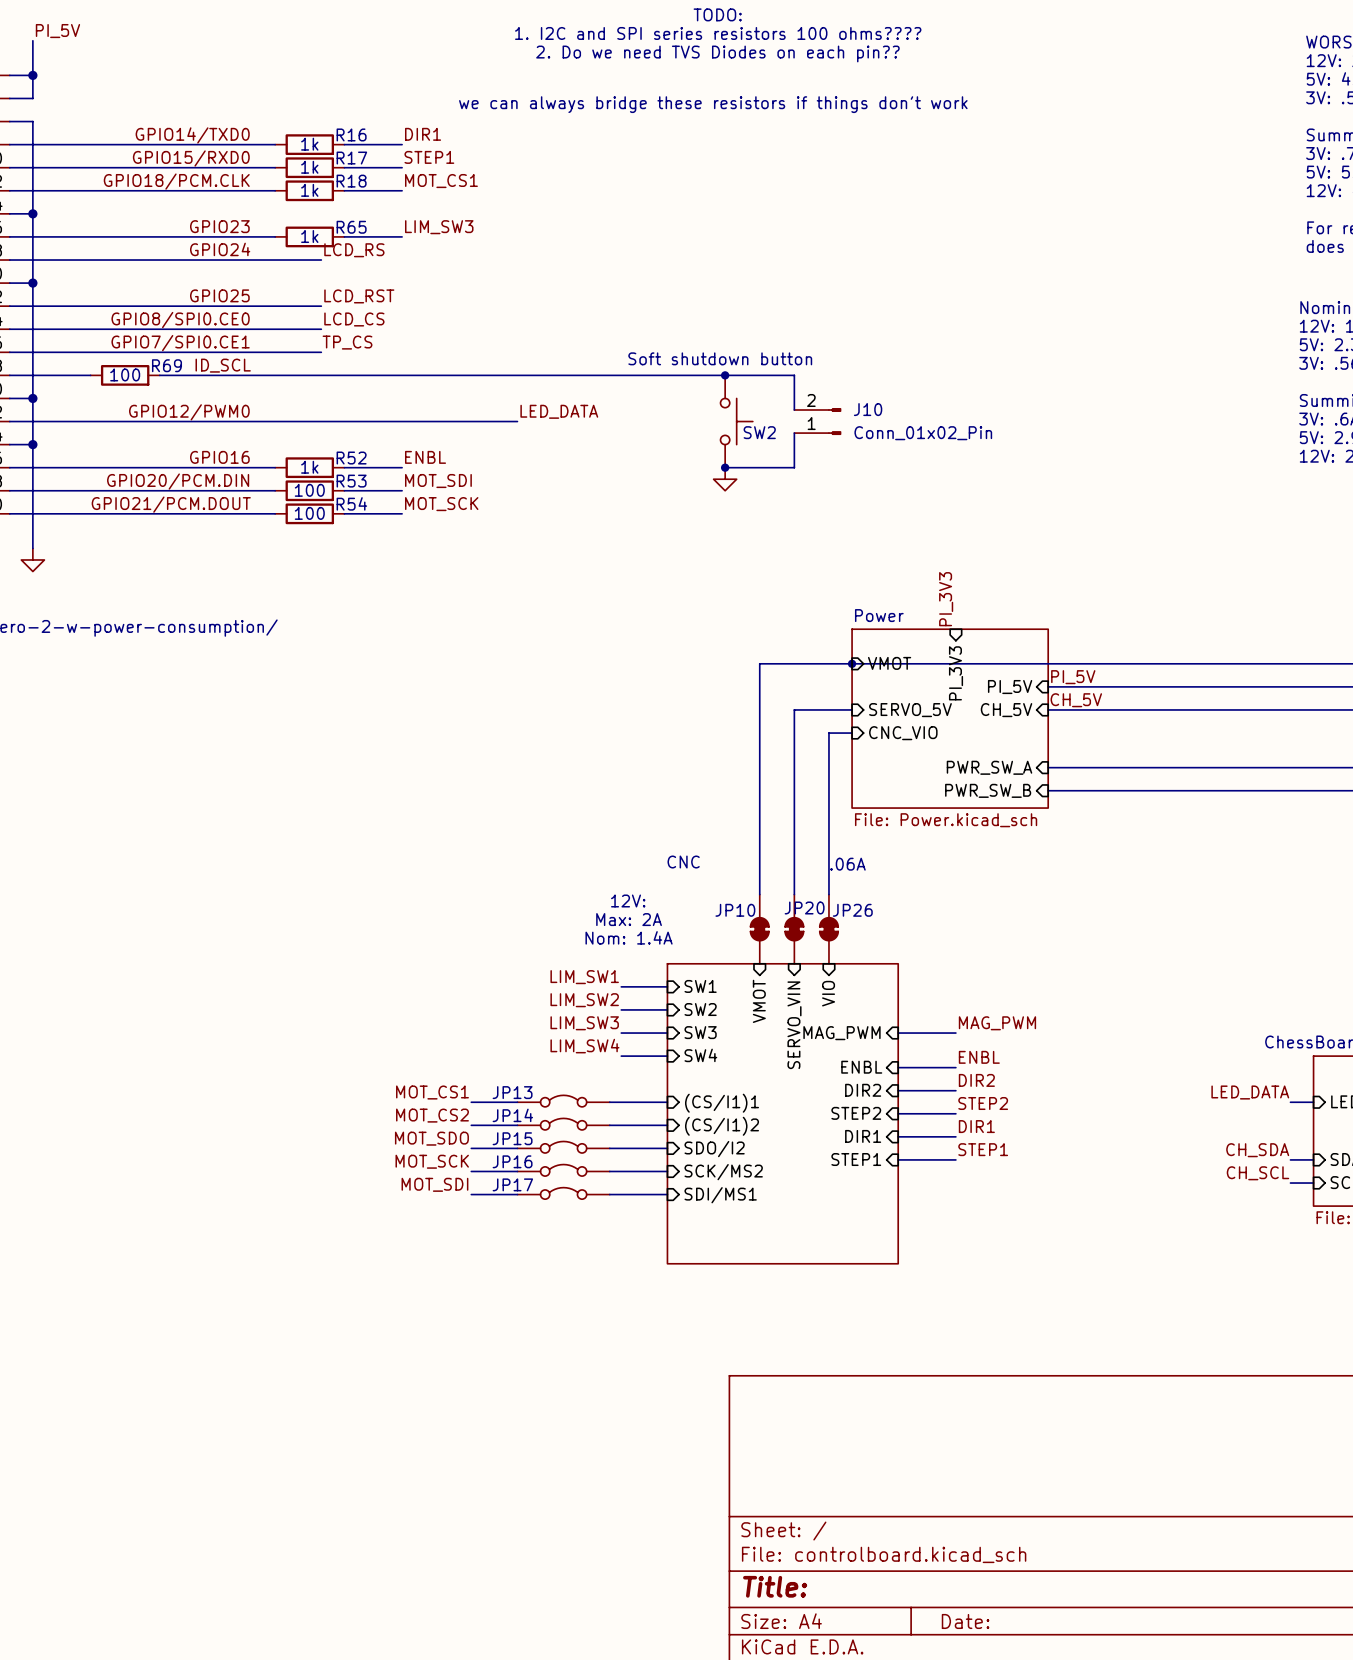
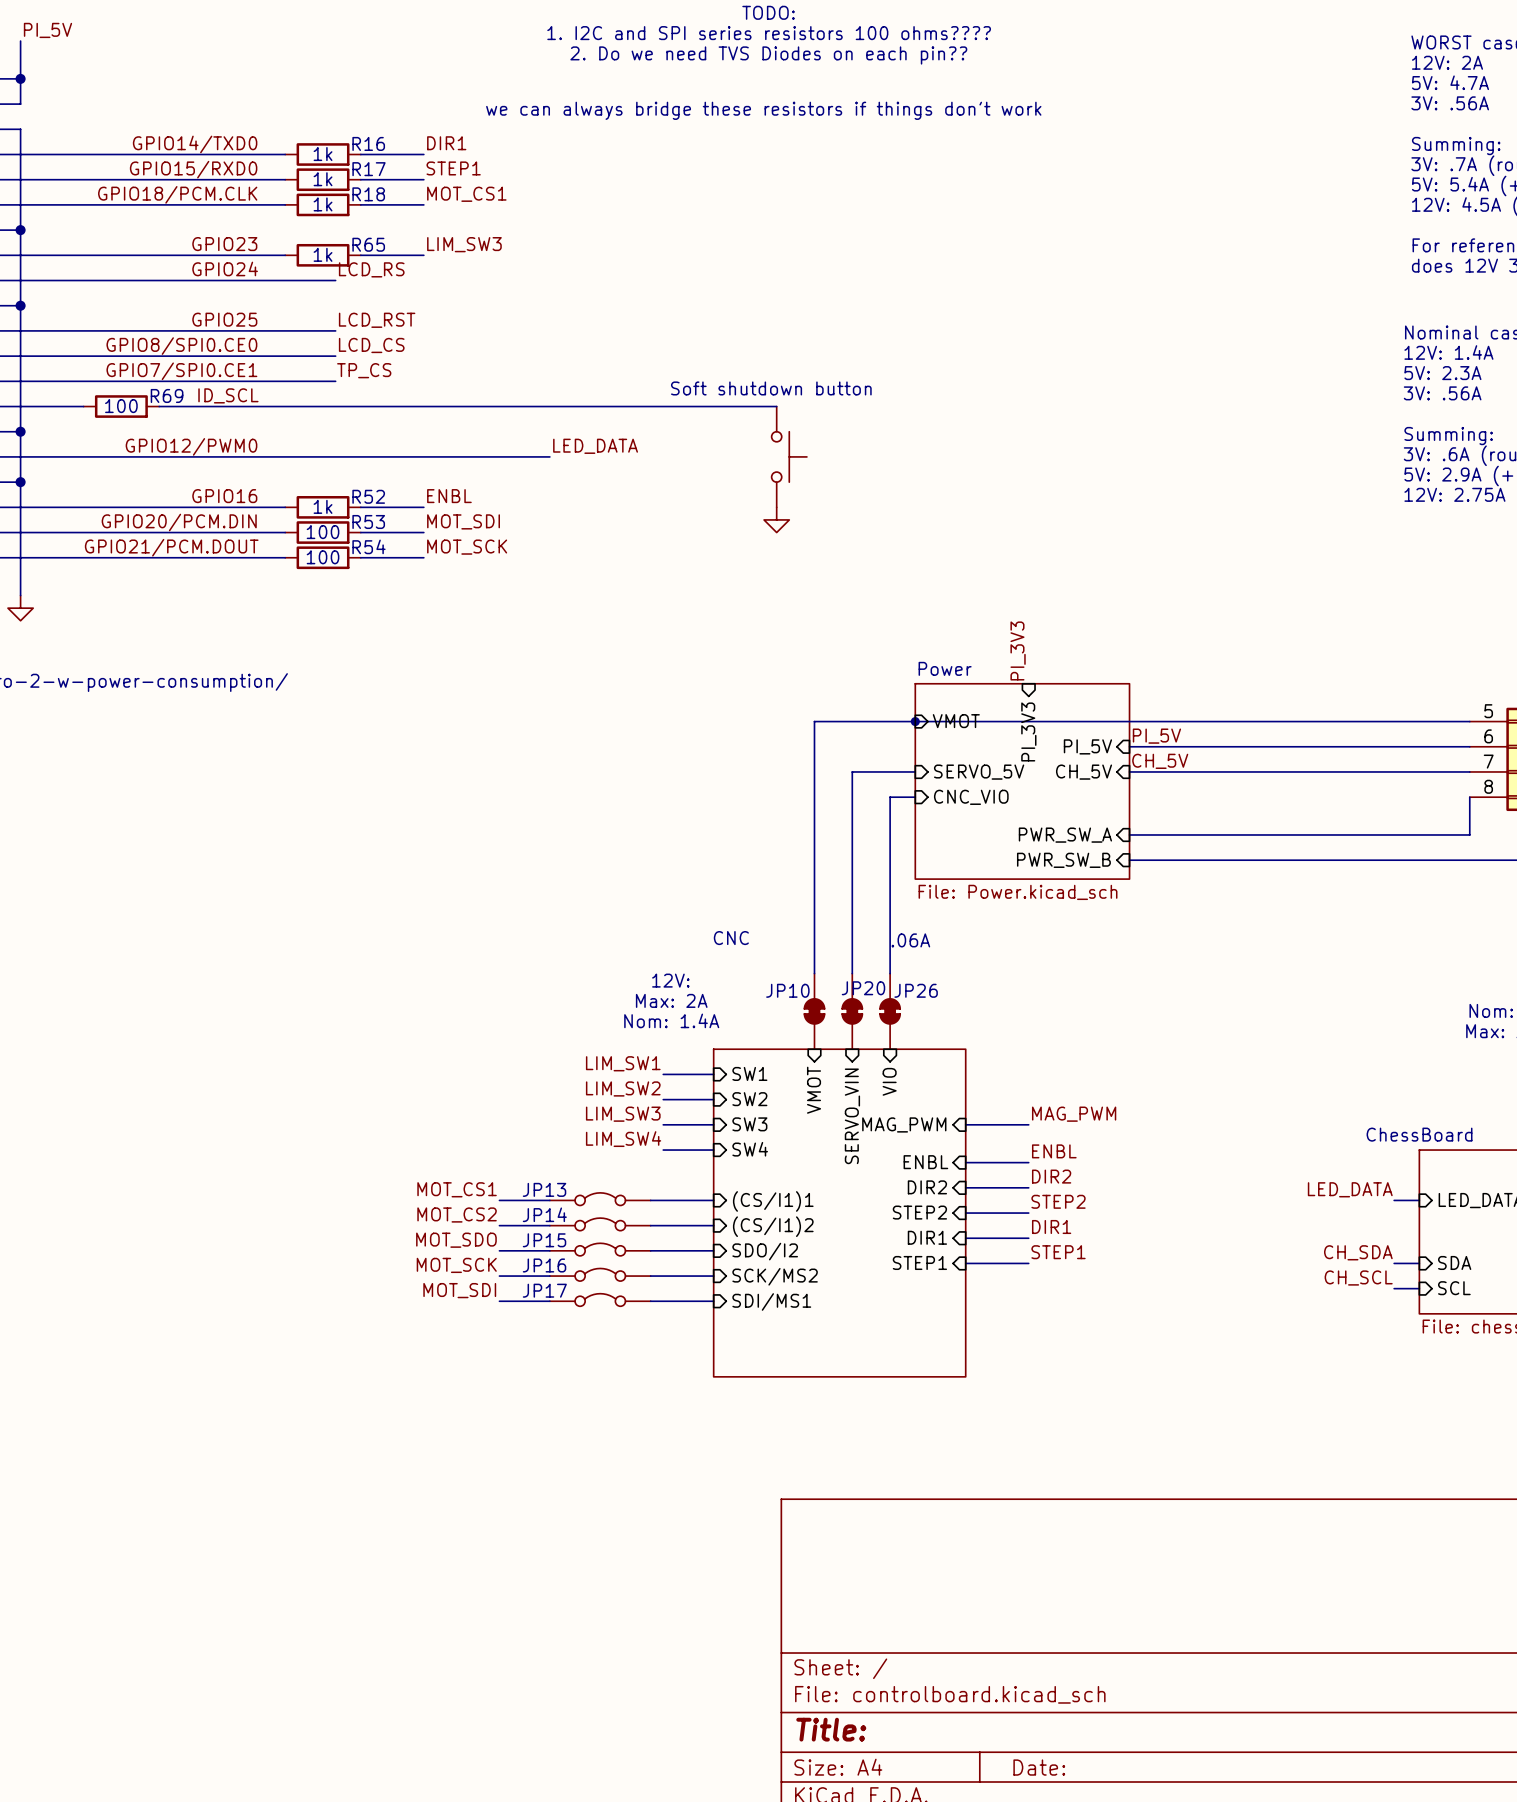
wire: (725, 375) (794, 375) (794, 409) -> none
junction: (725, 375) -> none
J10: Conn_01x02_Pin (817, 421) -> none
SW2 name: SW2 (759, 432) -> none
wire: (794, 433) (794, 467) (725, 467) -> none
junction: (725, 467) -> none

